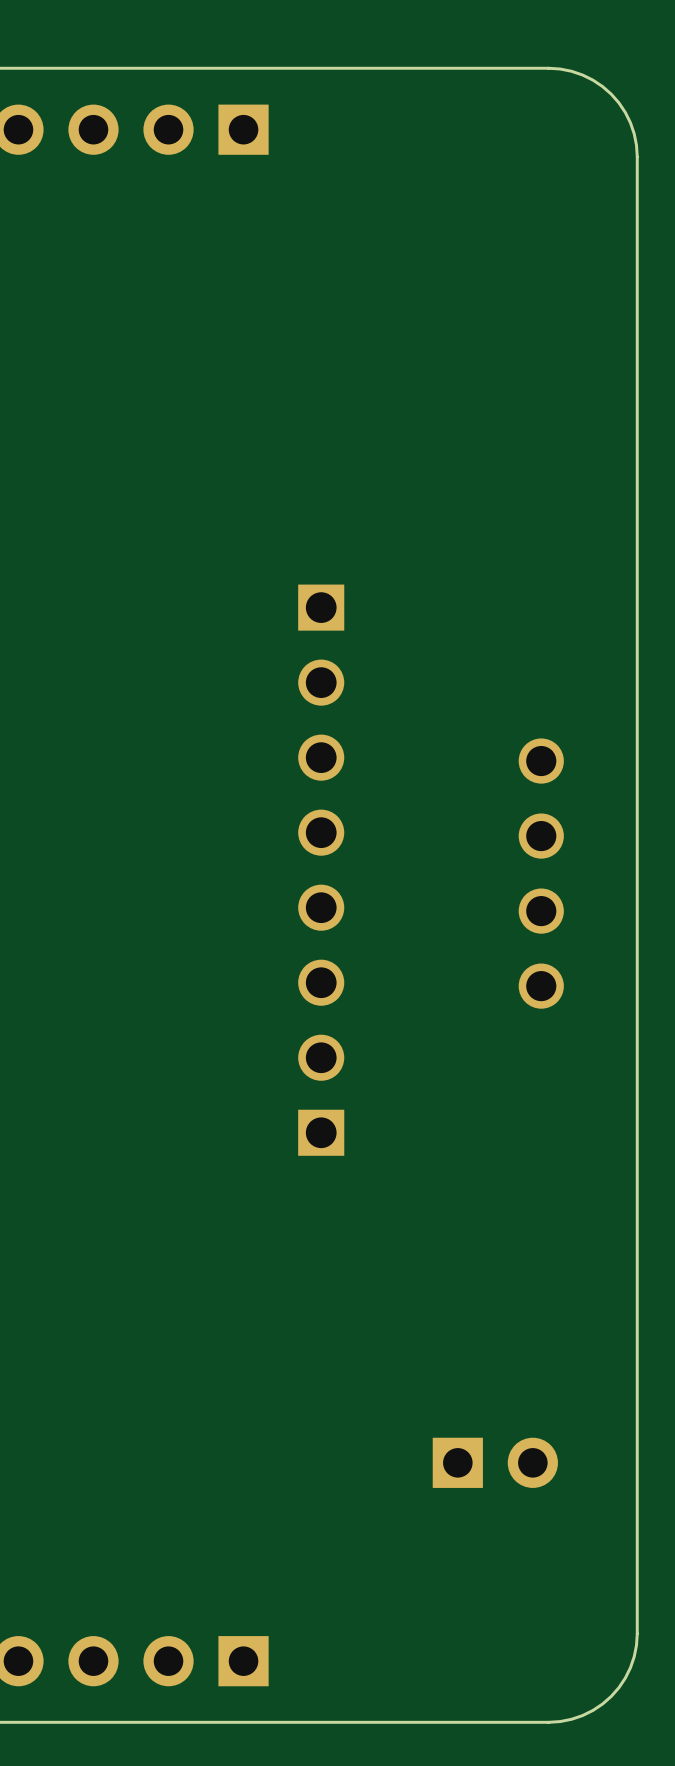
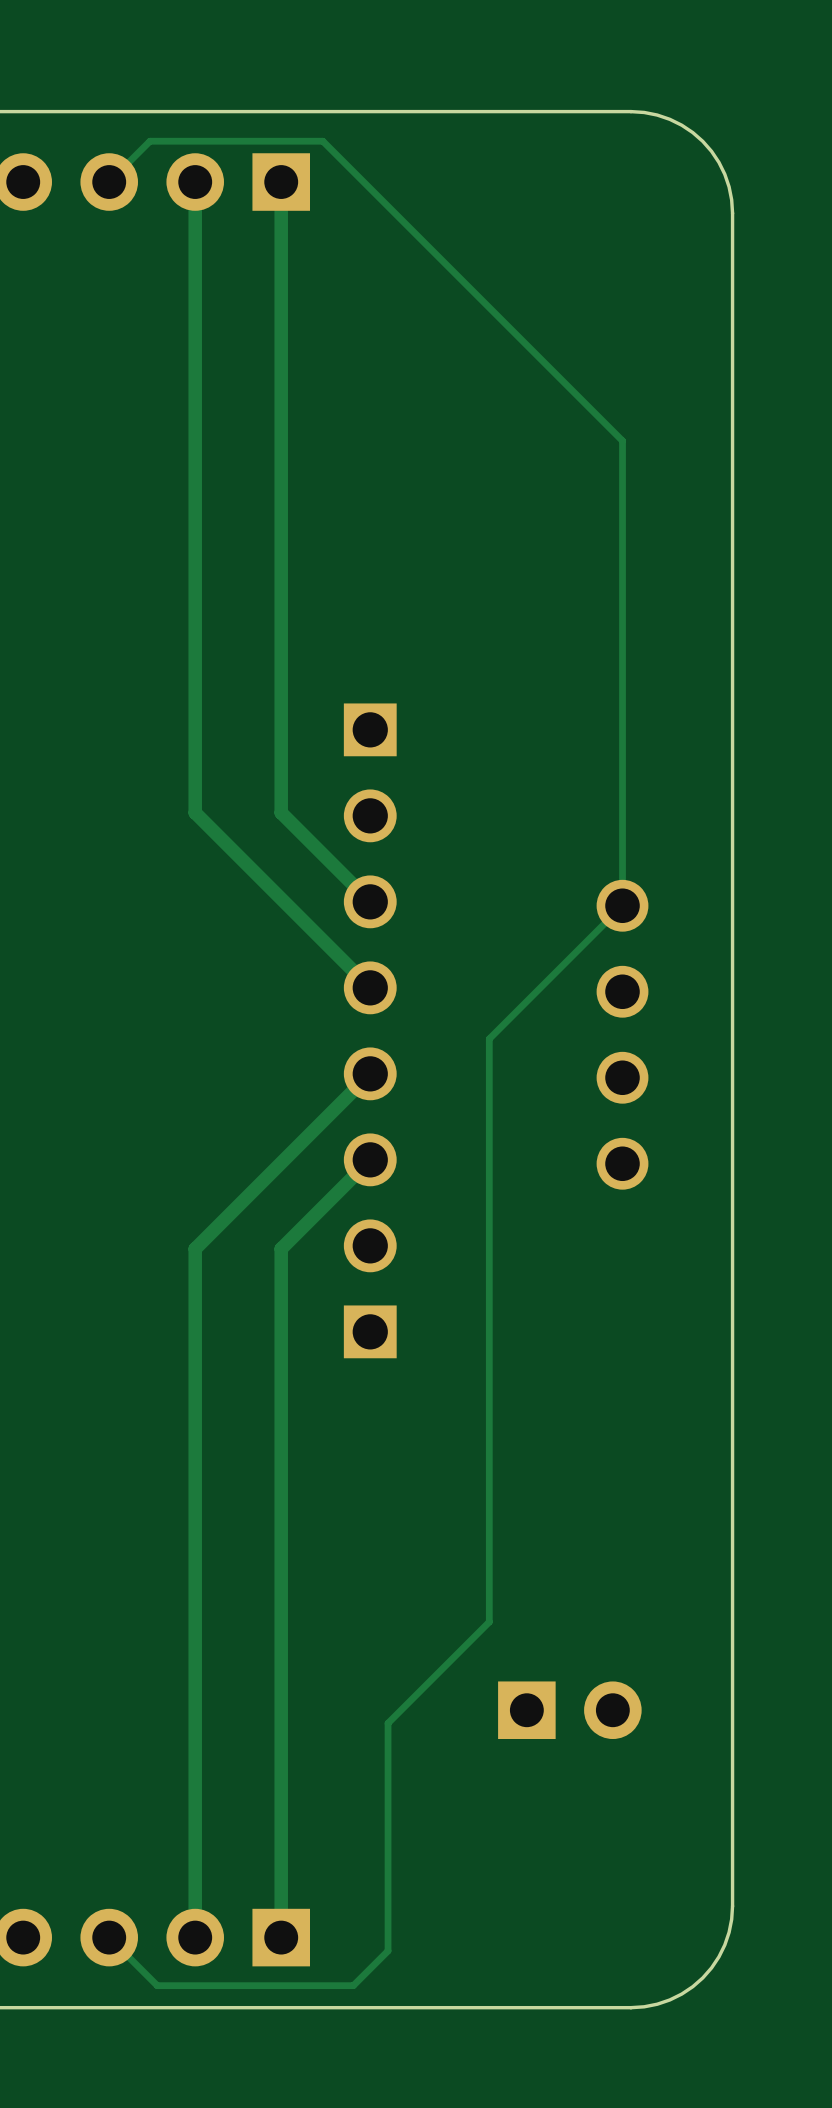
track: none -> (109, 182) (150, 141) (322, 141) (622, 440) (622, 905) (489, 1038) (489, 1621) (388, 1723) (388, 1950) (353, 1985) (157, 1985) (109, 1937)
track: none -> (195, 182) (195, 812) (370, 987)
track: none -> (281, 182) (281, 812) (370, 901)
track: none -> (370, 1073) (195, 1248) (195, 1937)
track: none -> (370, 1159) (281, 1248) (281, 1937)

